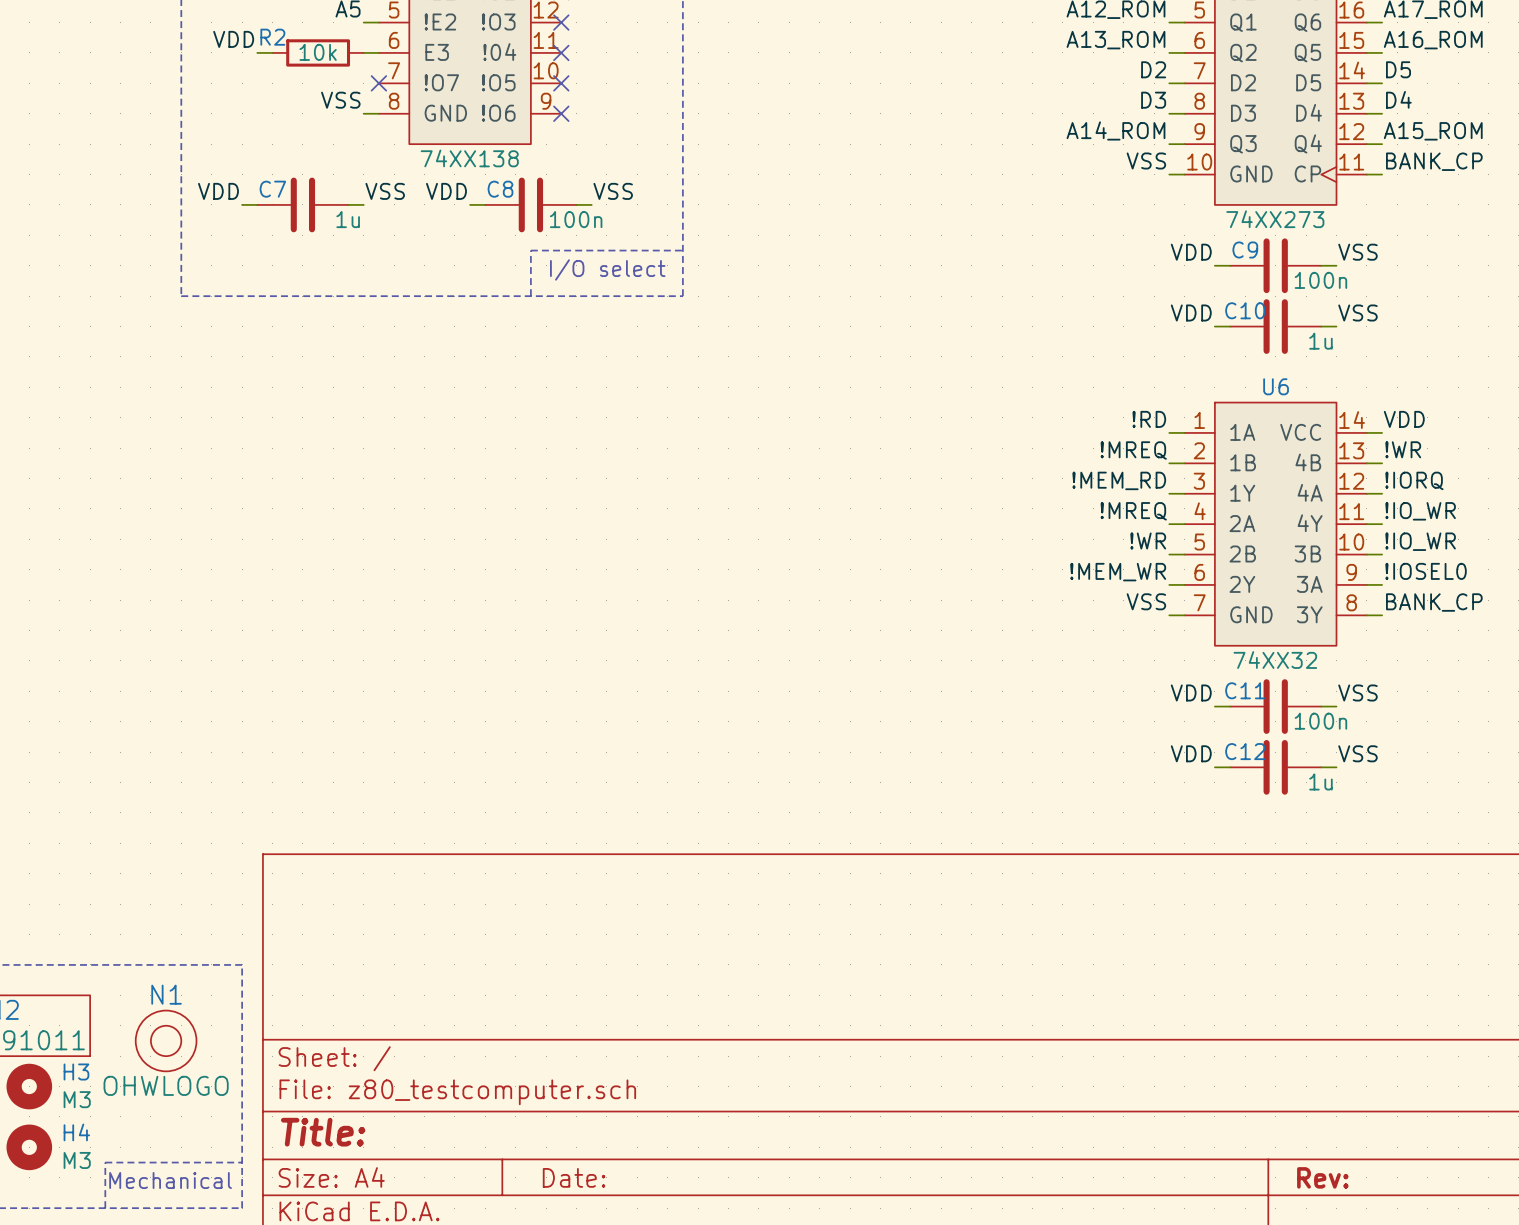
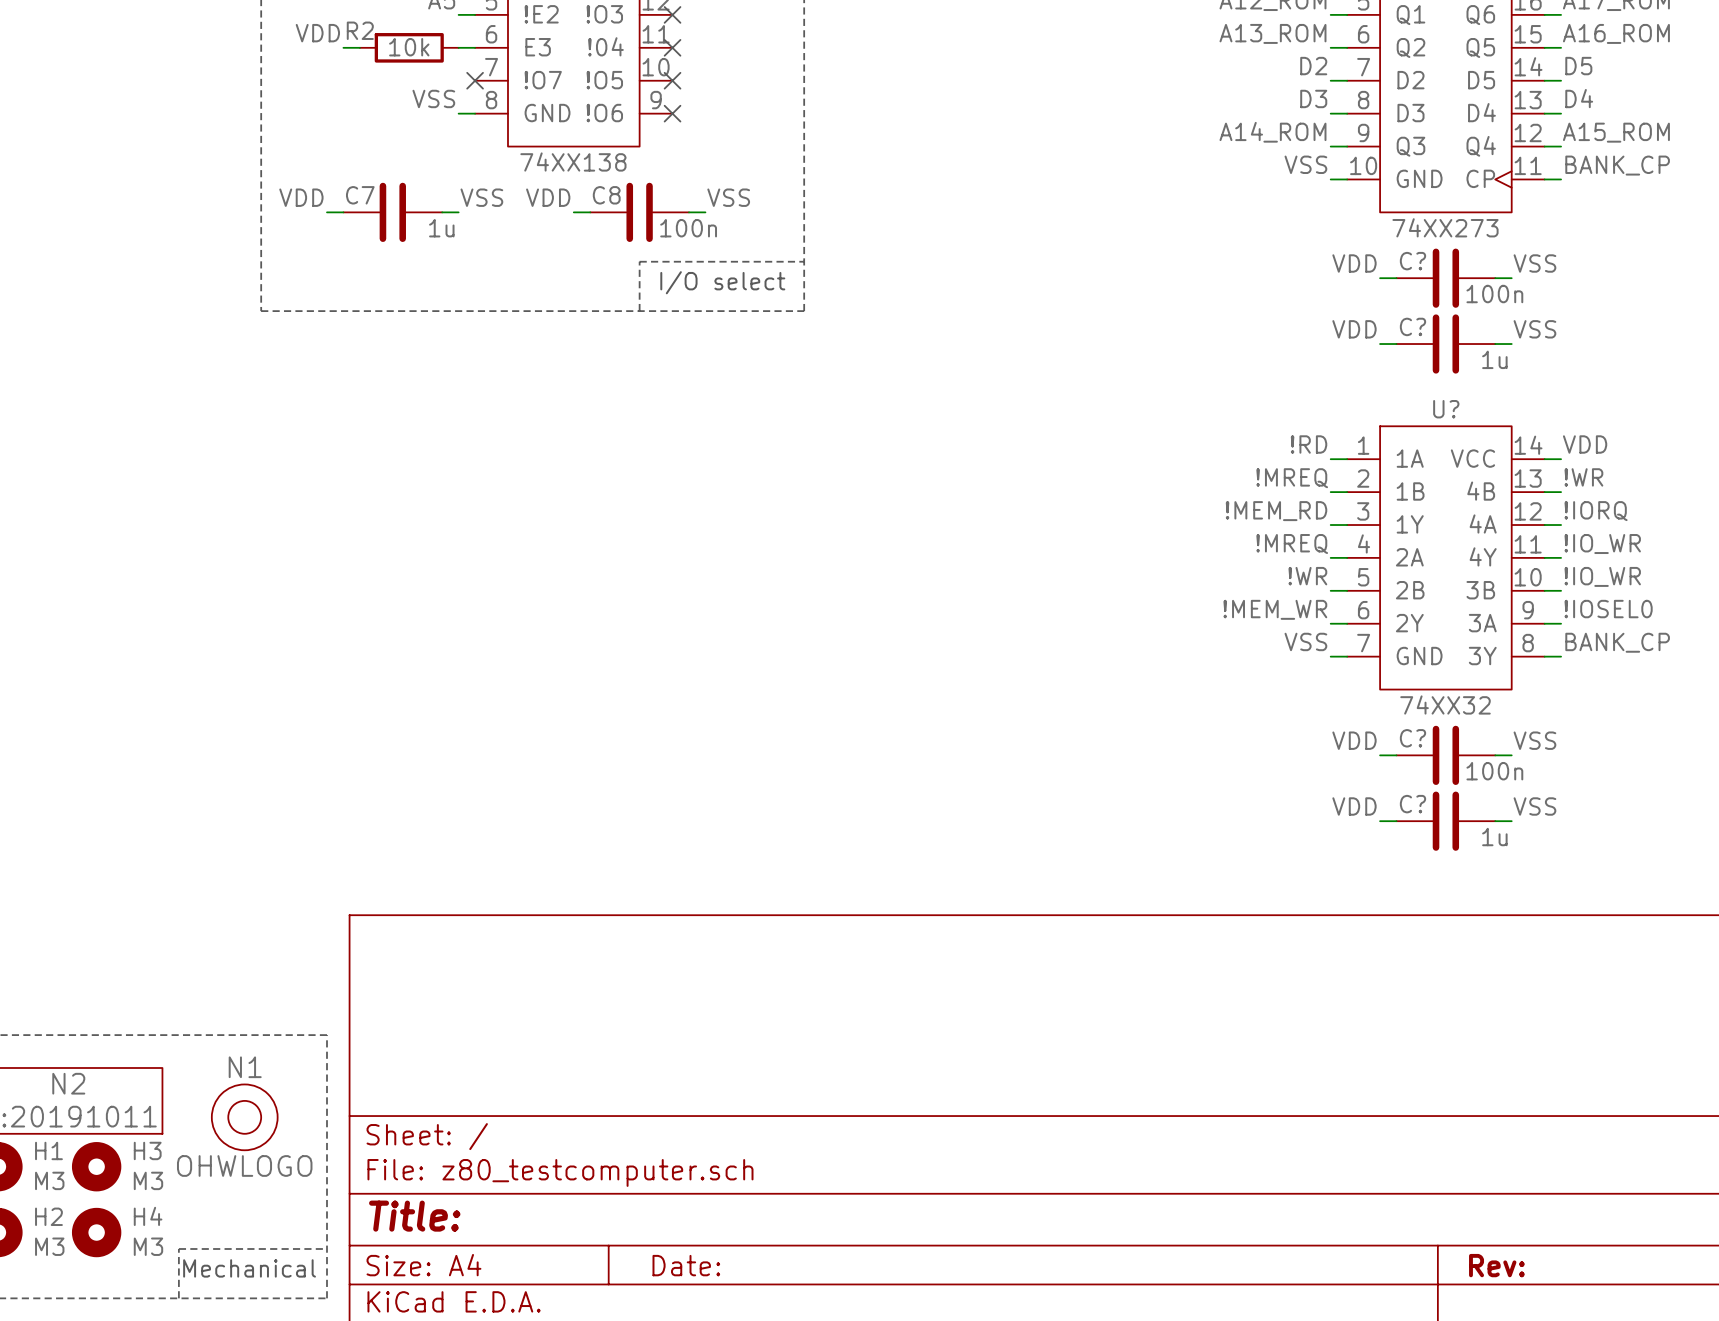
C9 name: C9 (1245, 249) -> C? (1412, 261)
C10 name: C10 (1245, 310) -> C? (1412, 326)
U6 name: U6 (1276, 386) -> U? (1446, 409)
C11 name: C11 (1245, 690) -> C? (1412, 738)
C12 name: C12 (1245, 751) -> C? (1412, 804)

